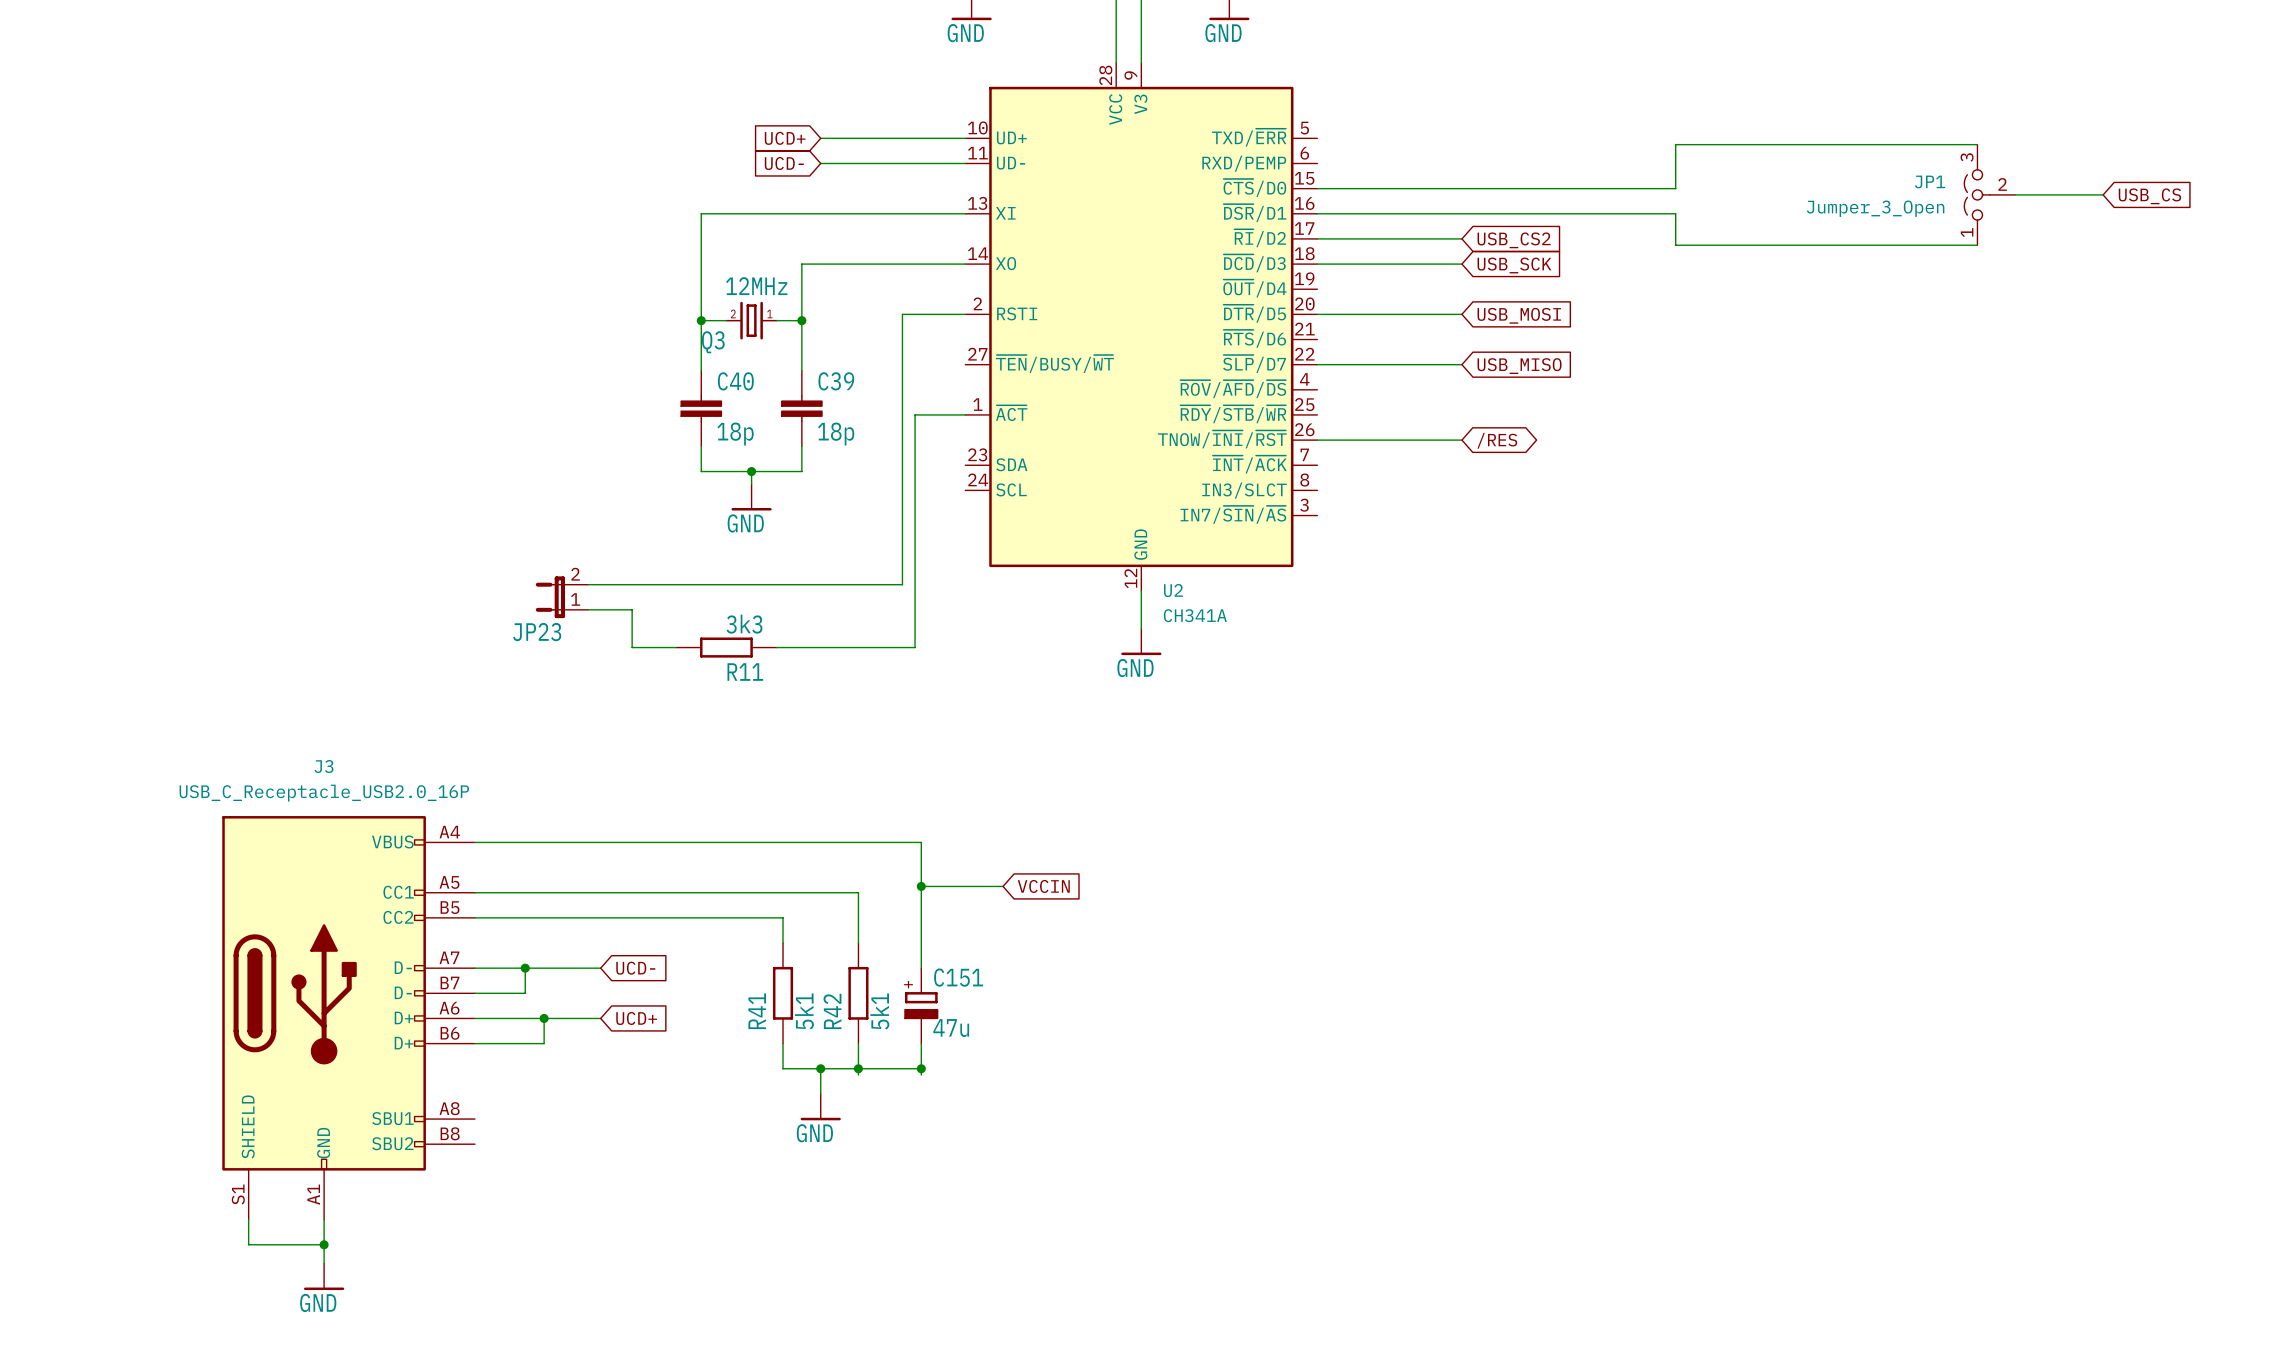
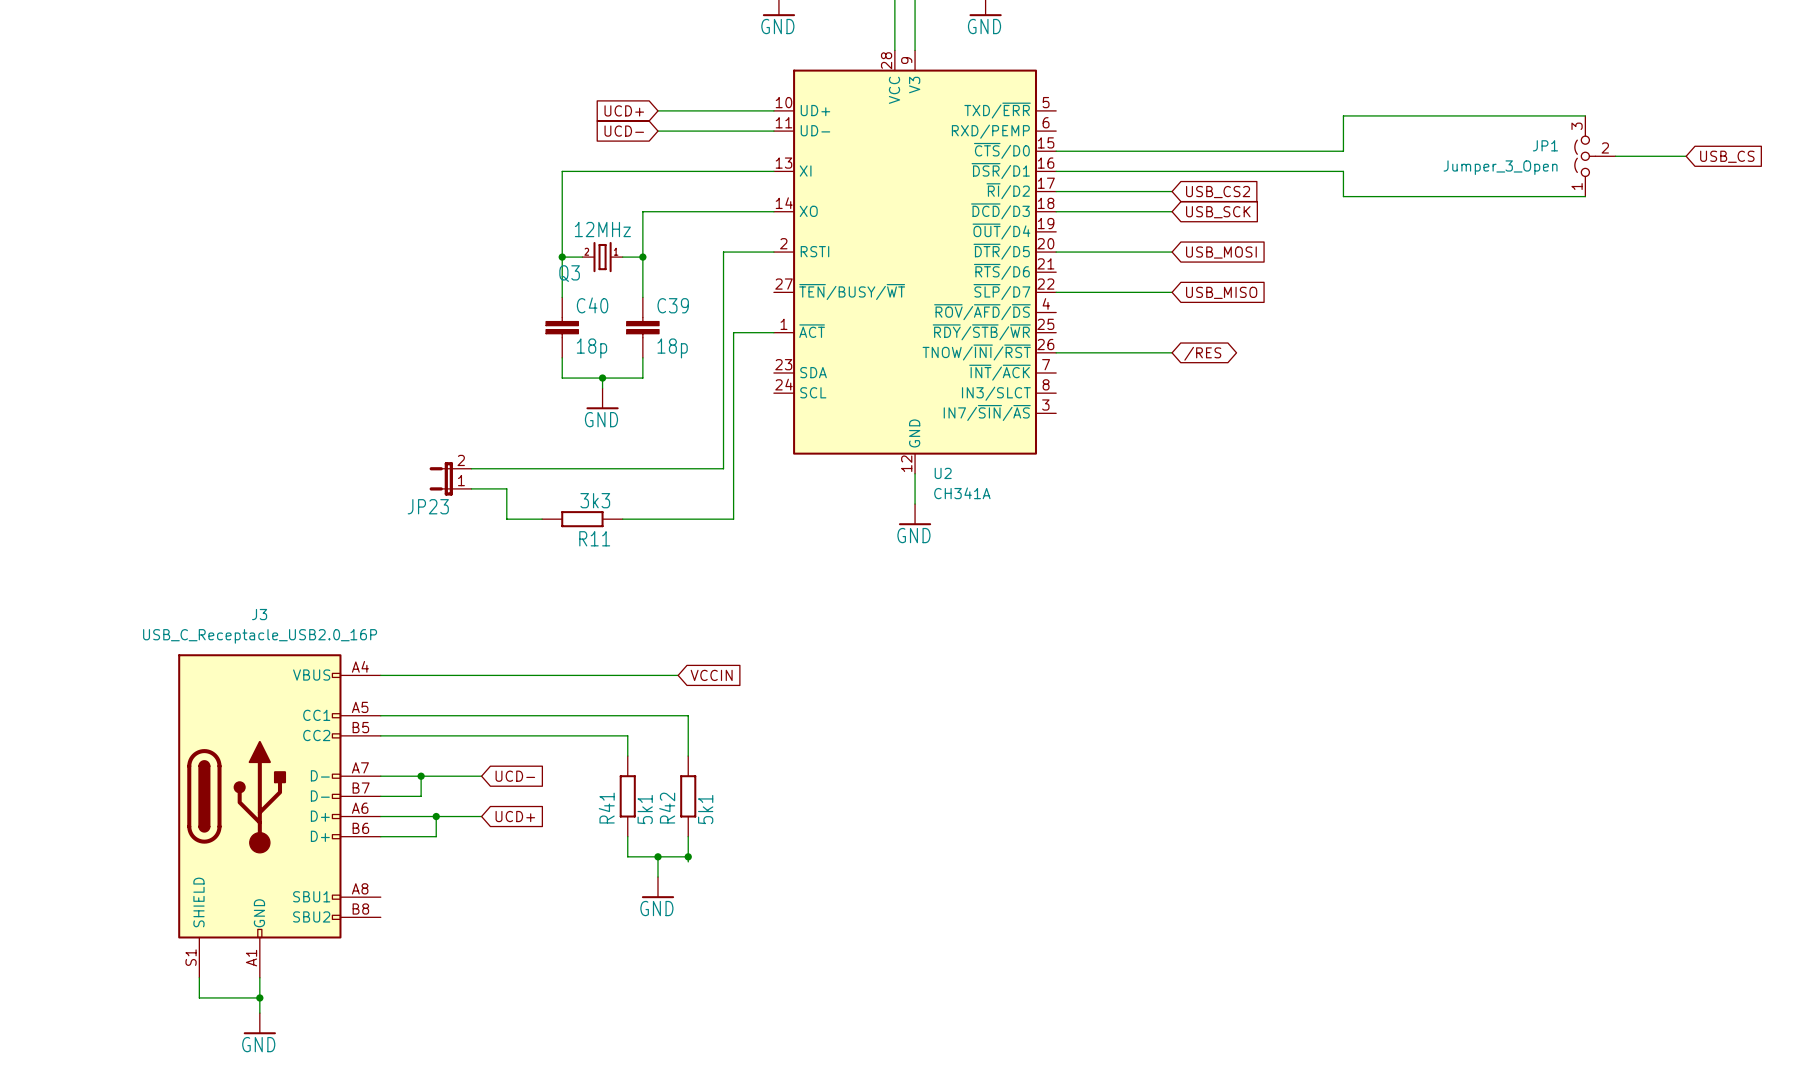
wire: (845, 842) (921, 842) (921, 968) -> none
wire: (921, 886) (1003, 886) -> none
junction: (921, 886) -> none
global label position: VCCIN (1043, 886) -> VCCIN (711, 675)
C151: 47u (921, 1005) -> none
wire: (921, 1043) (921, 1075) -> none
wire: (858, 1068) (921, 1068) -> none
junction: (921, 1068) -> none

